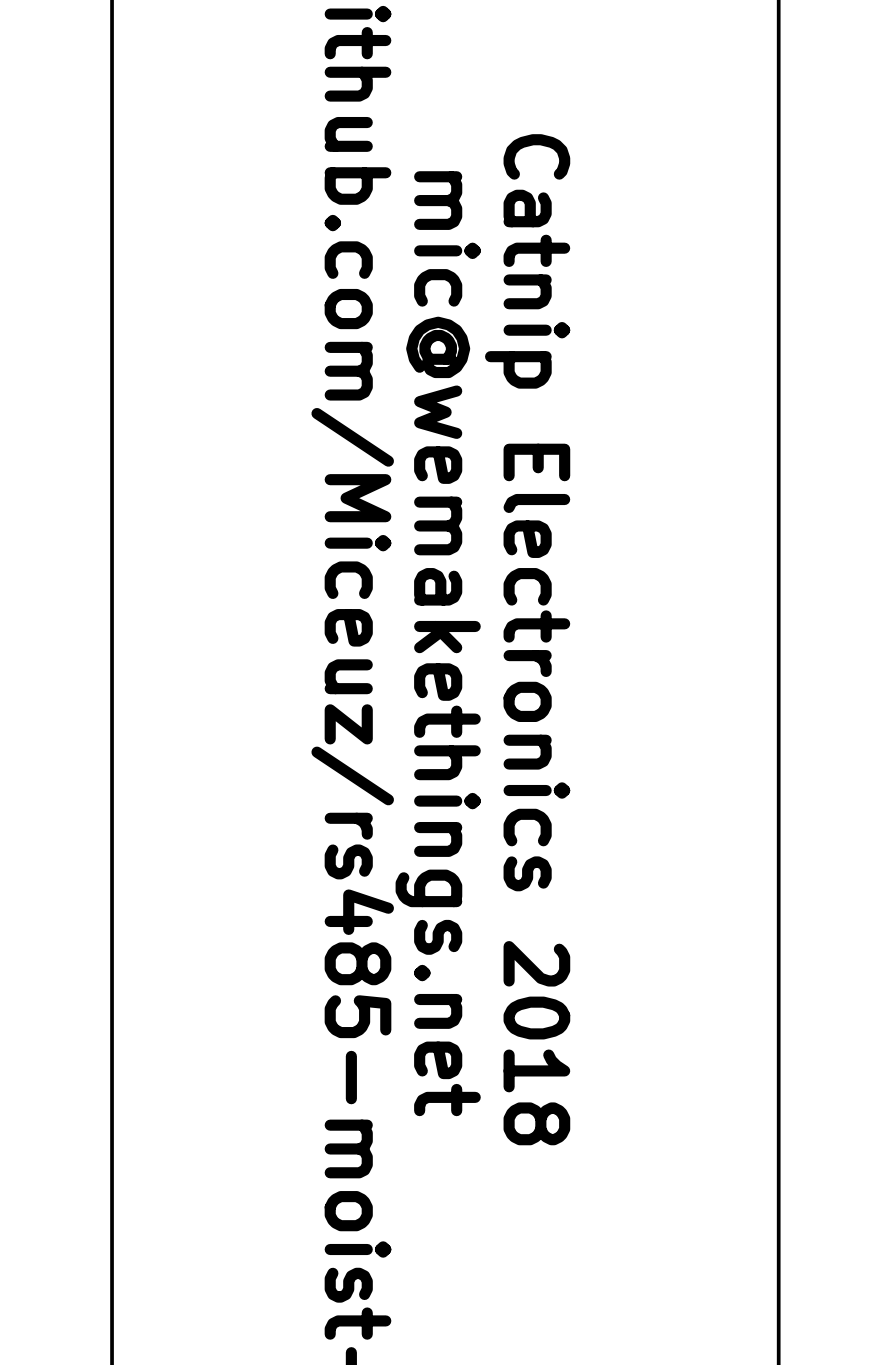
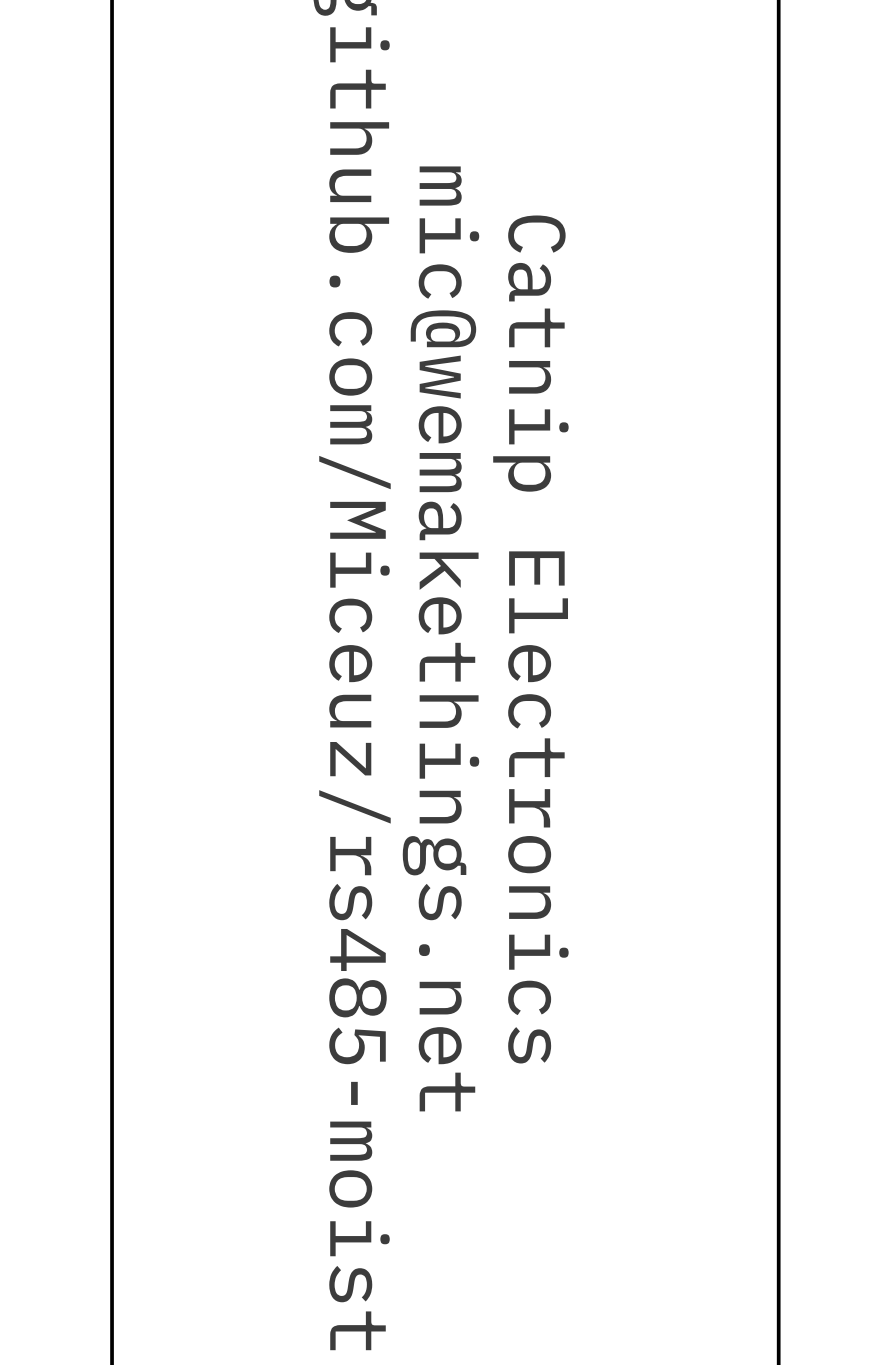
text: Catnip Electronics 2018 (527, 639) -> Catnip Electronics (530, 639)

